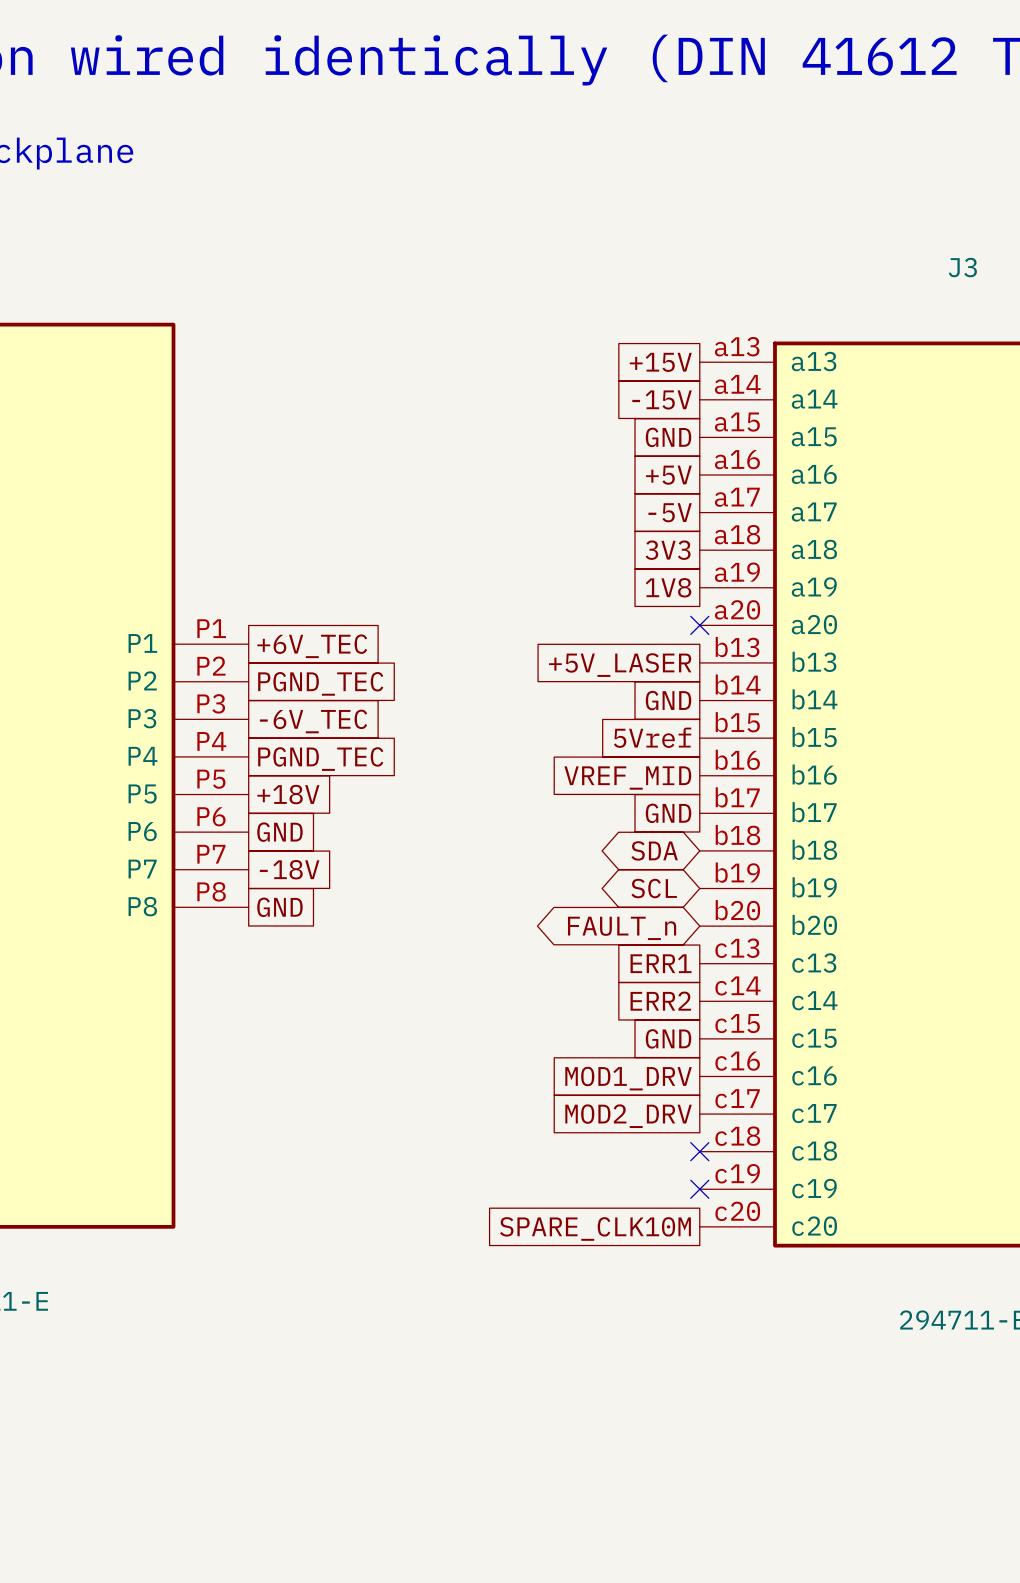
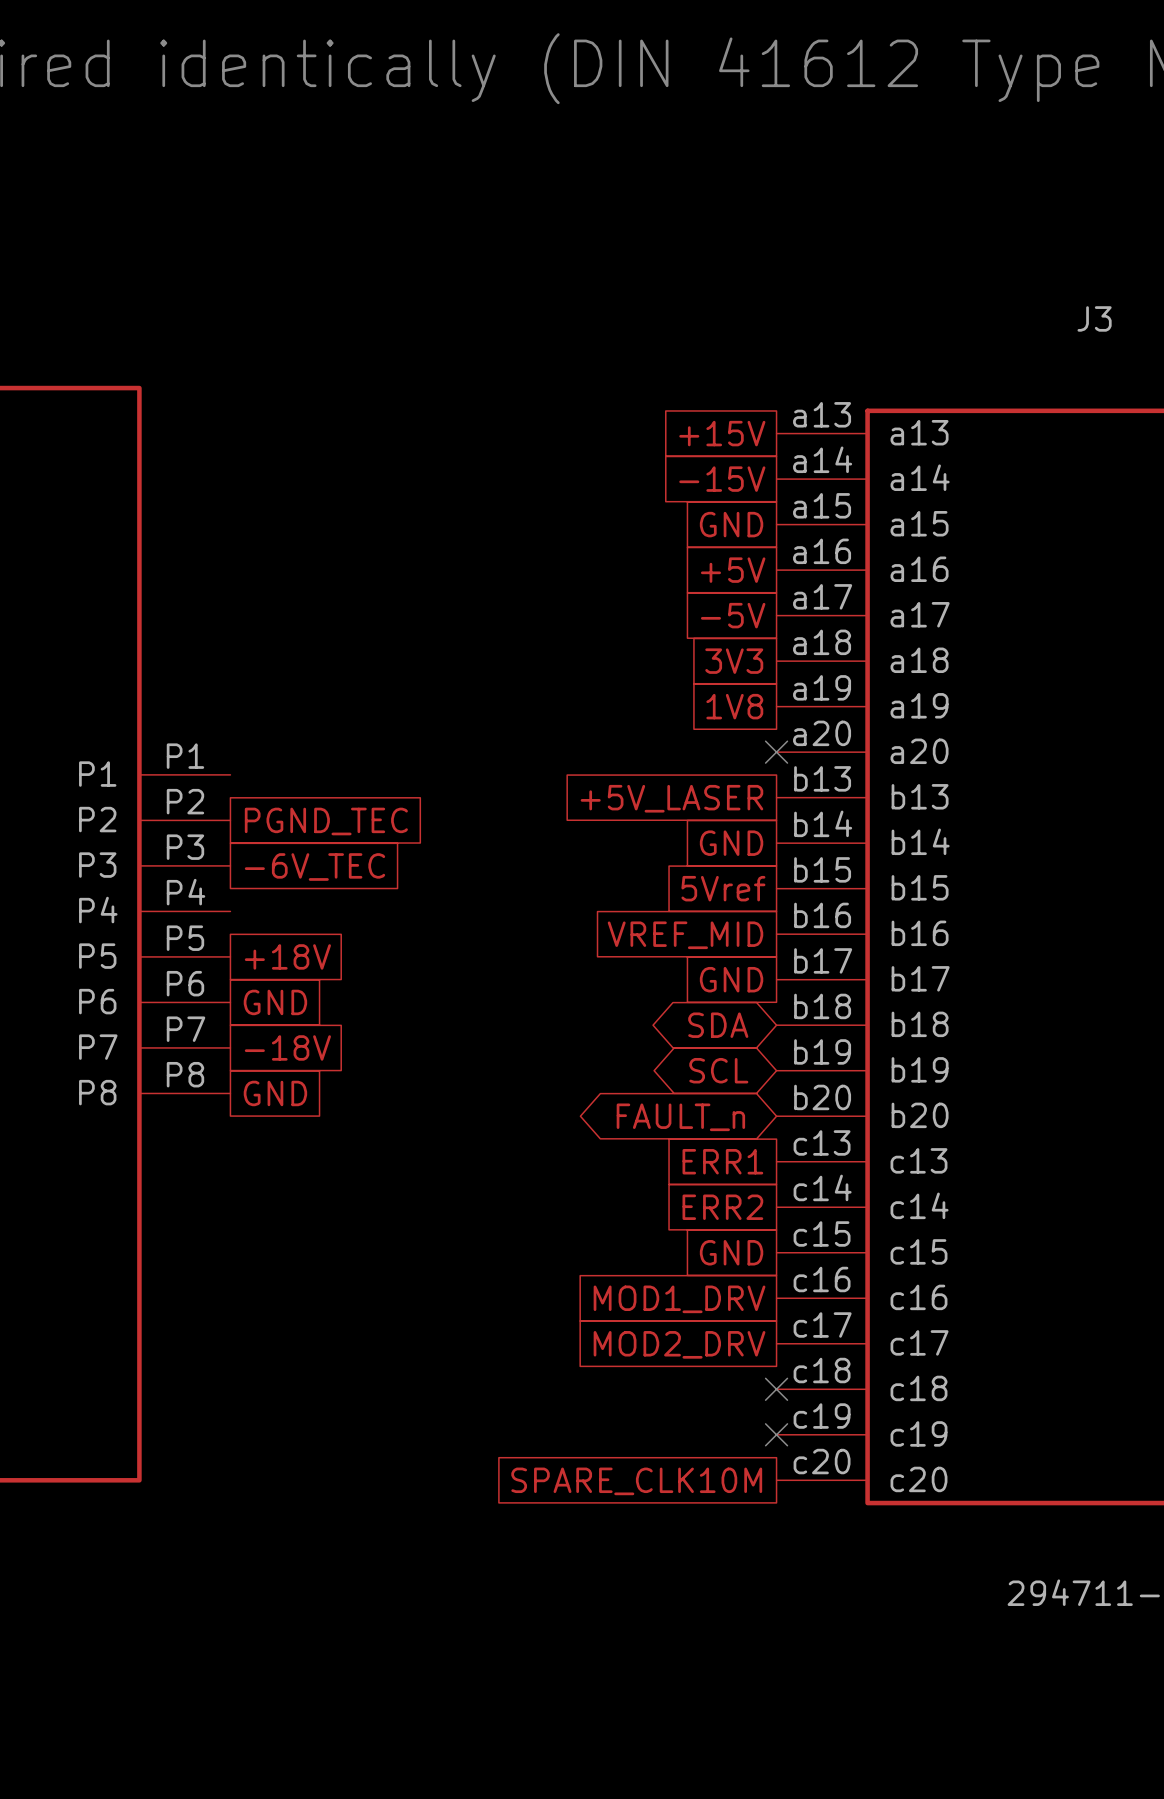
global label: +6V_TEC (312, 646) -> none
global label: PGND_TEC (320, 759) -> none

